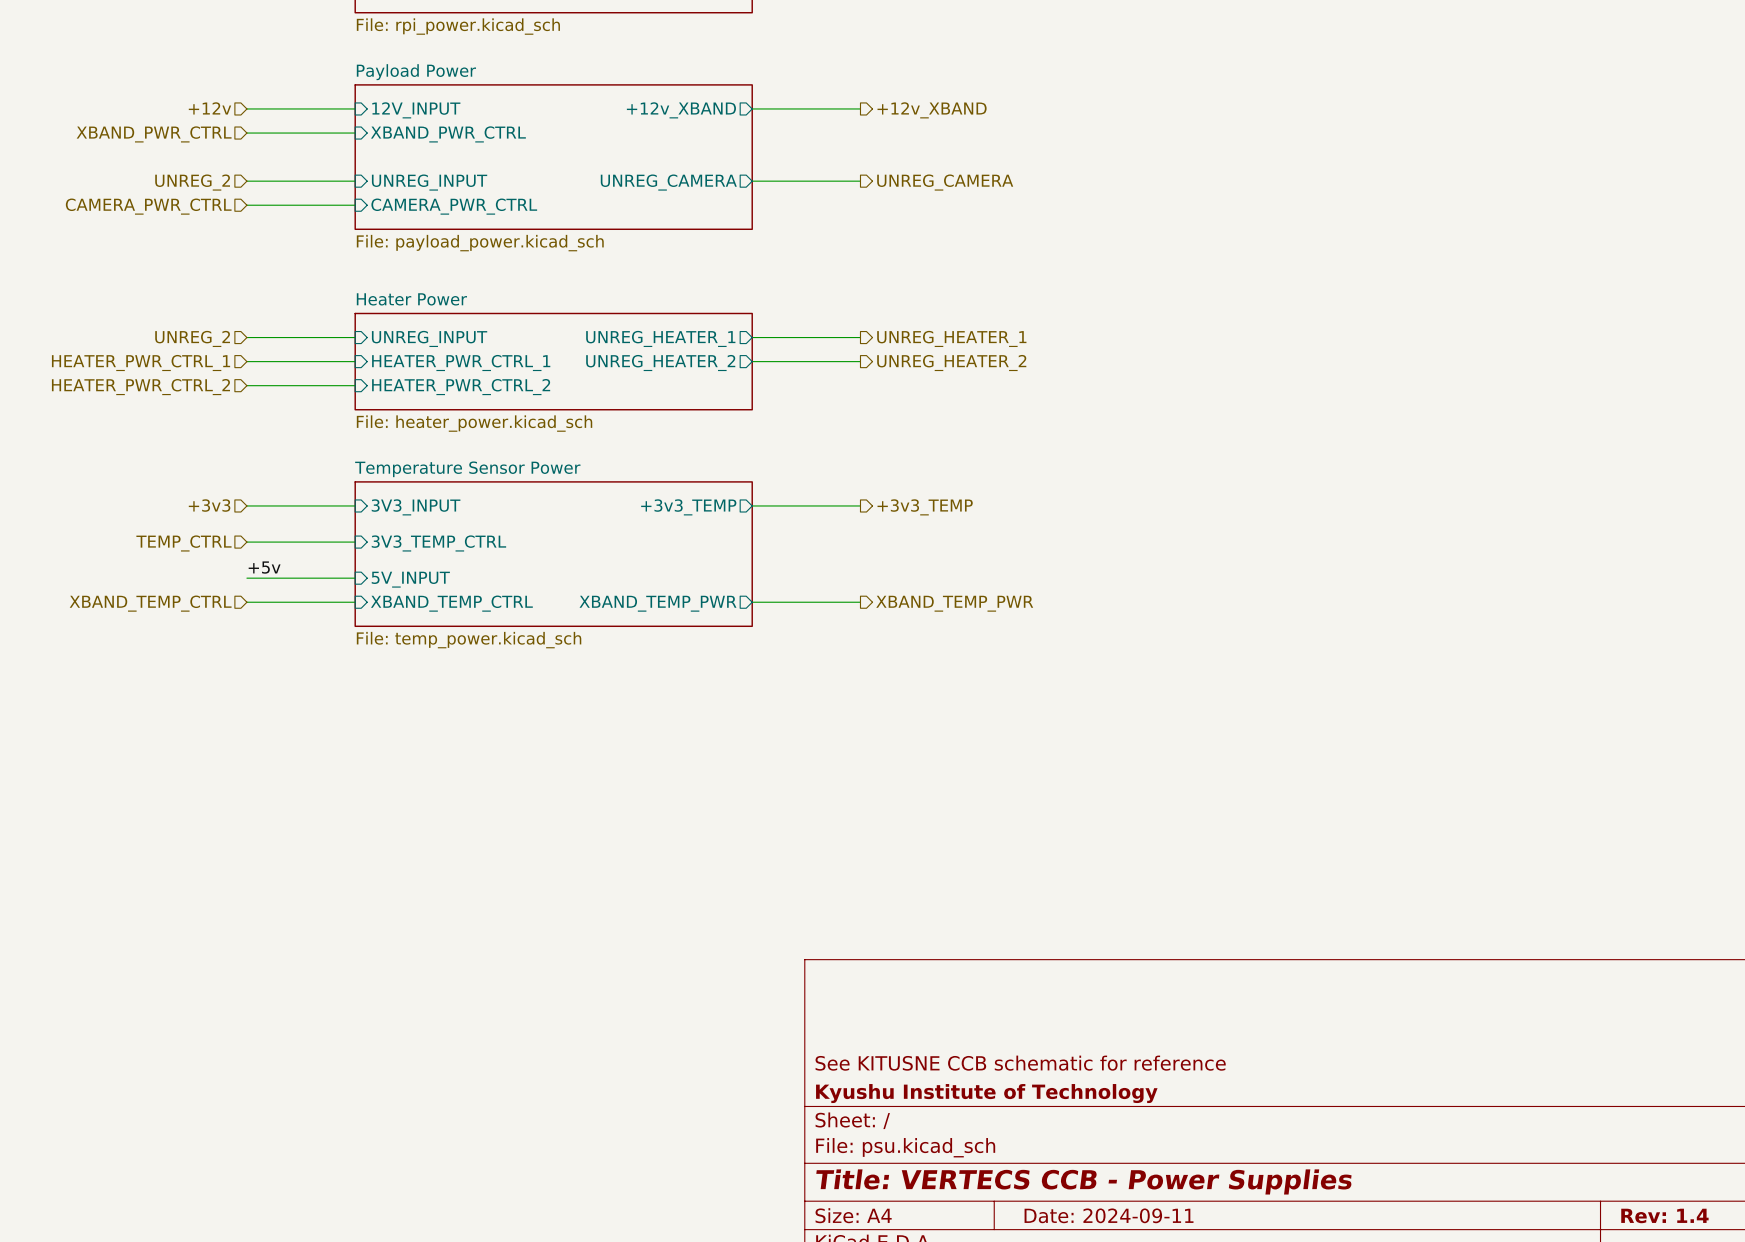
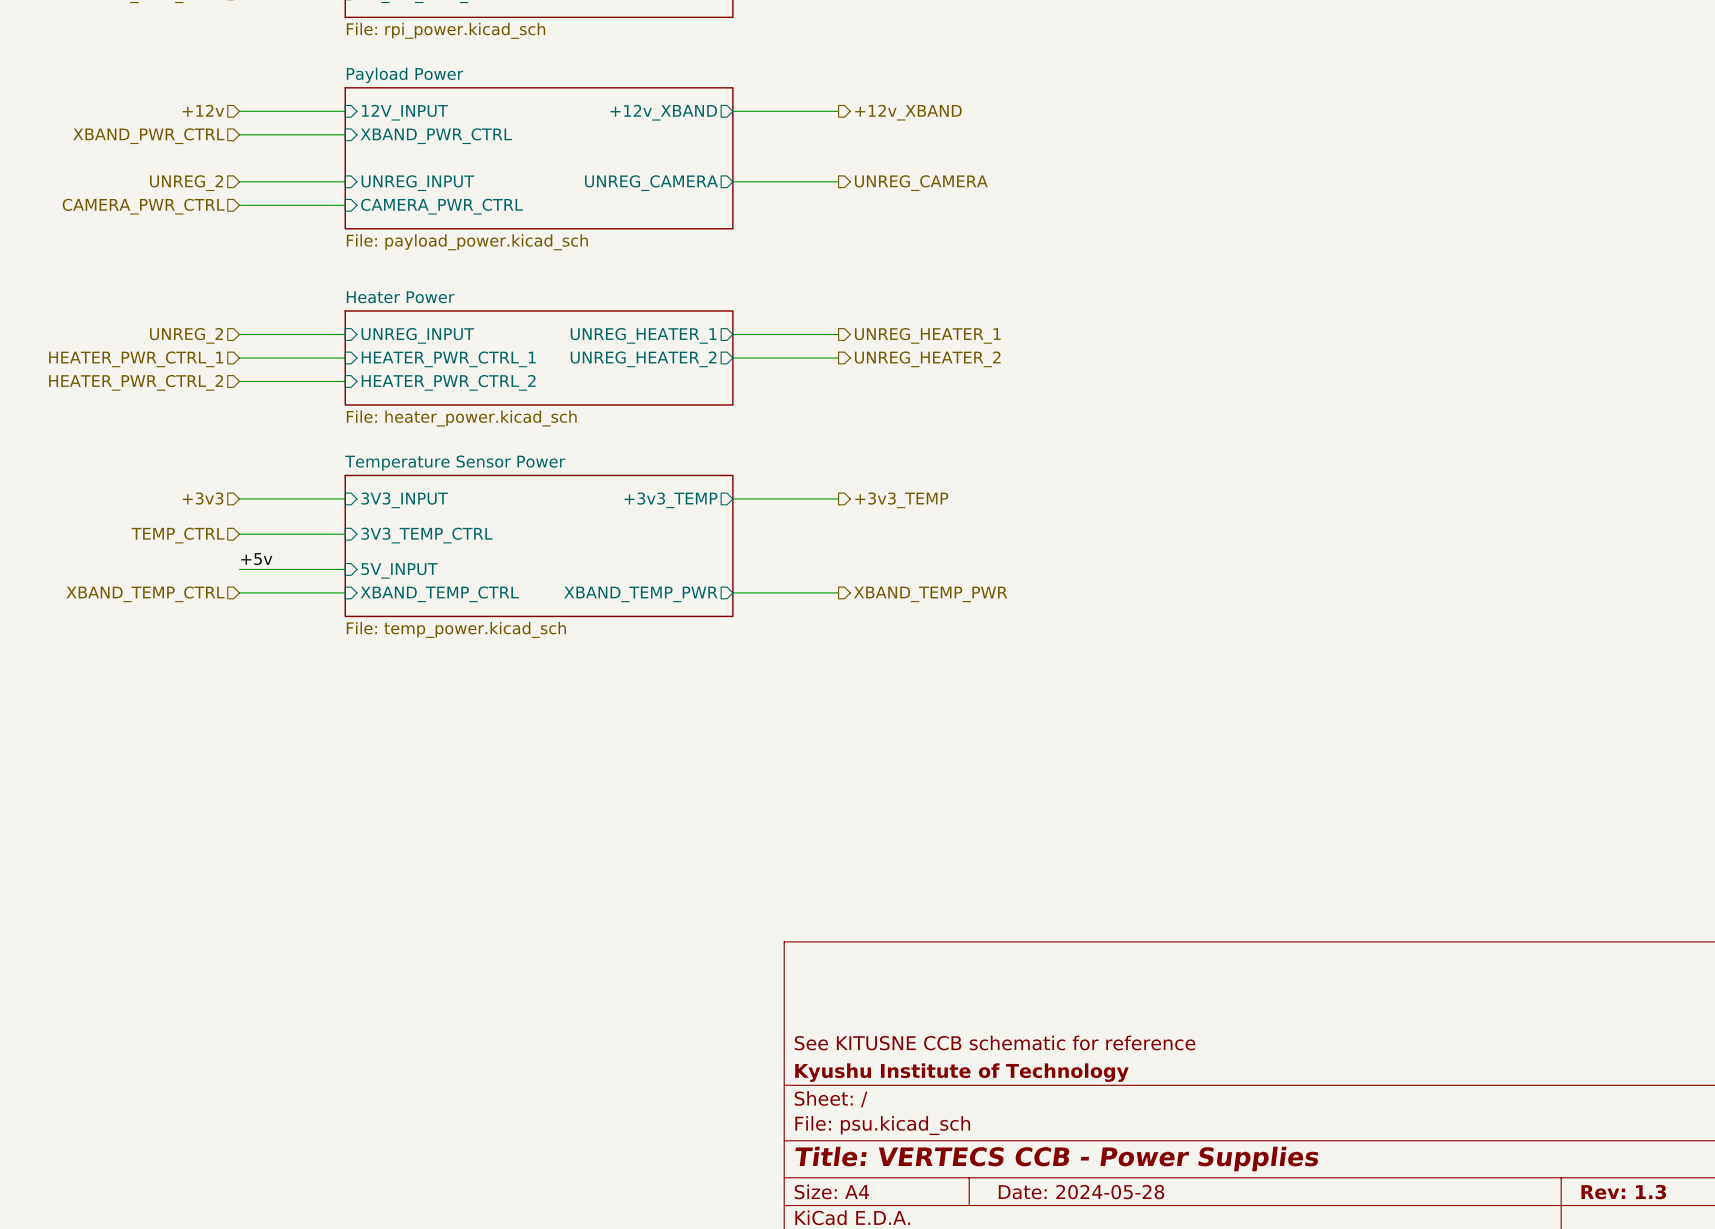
title block: Date: 2024-09-11 (1109, 1215) -> Date: 2024-05-28 (1081, 1192)
title block: Rev: 1.4 (1664, 1215) -> Rev: 1.3 (1623, 1192)

